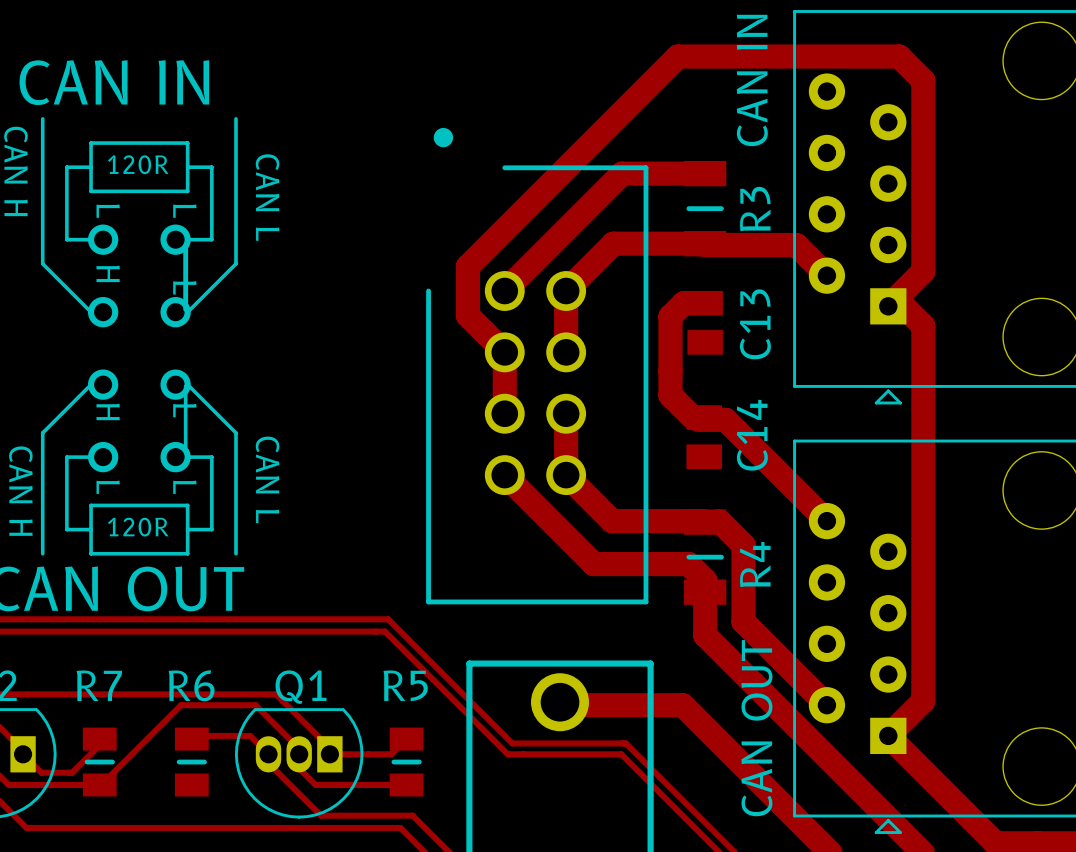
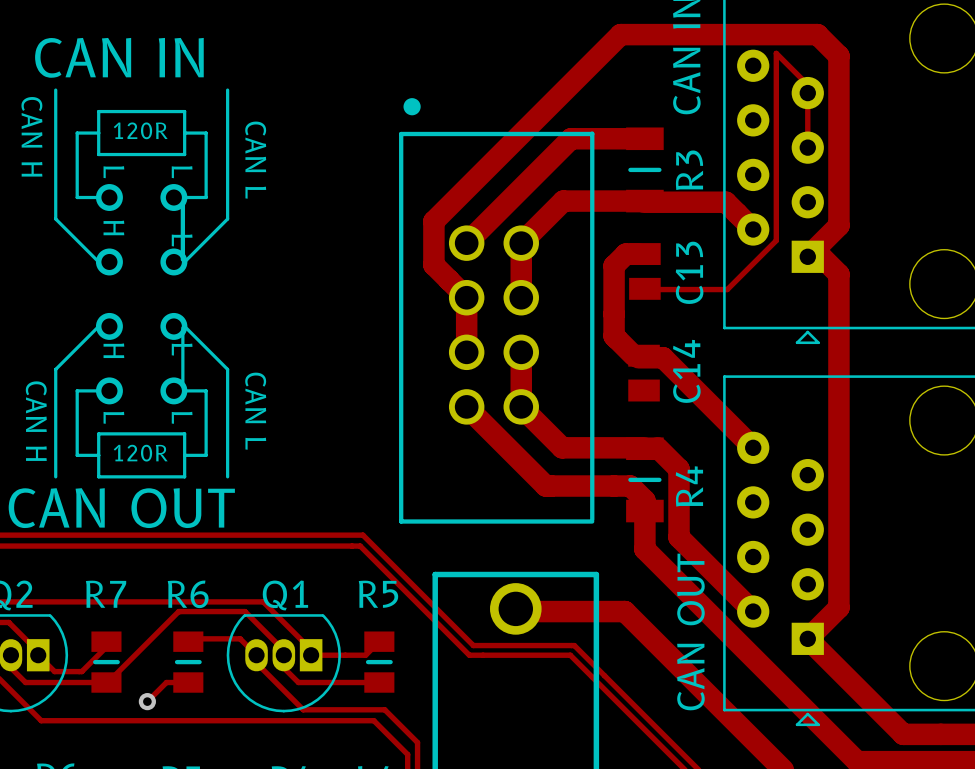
part footprint: [426, 165, 649, 605] -> [399, 131, 595, 524]
track: none -> (807, 147) (807, 84) (776, 53) (776, 240) (727, 289) (646, 289)
track: none -> (188, 682) (166, 682) (147, 701)
via: none -> (147, 701)

